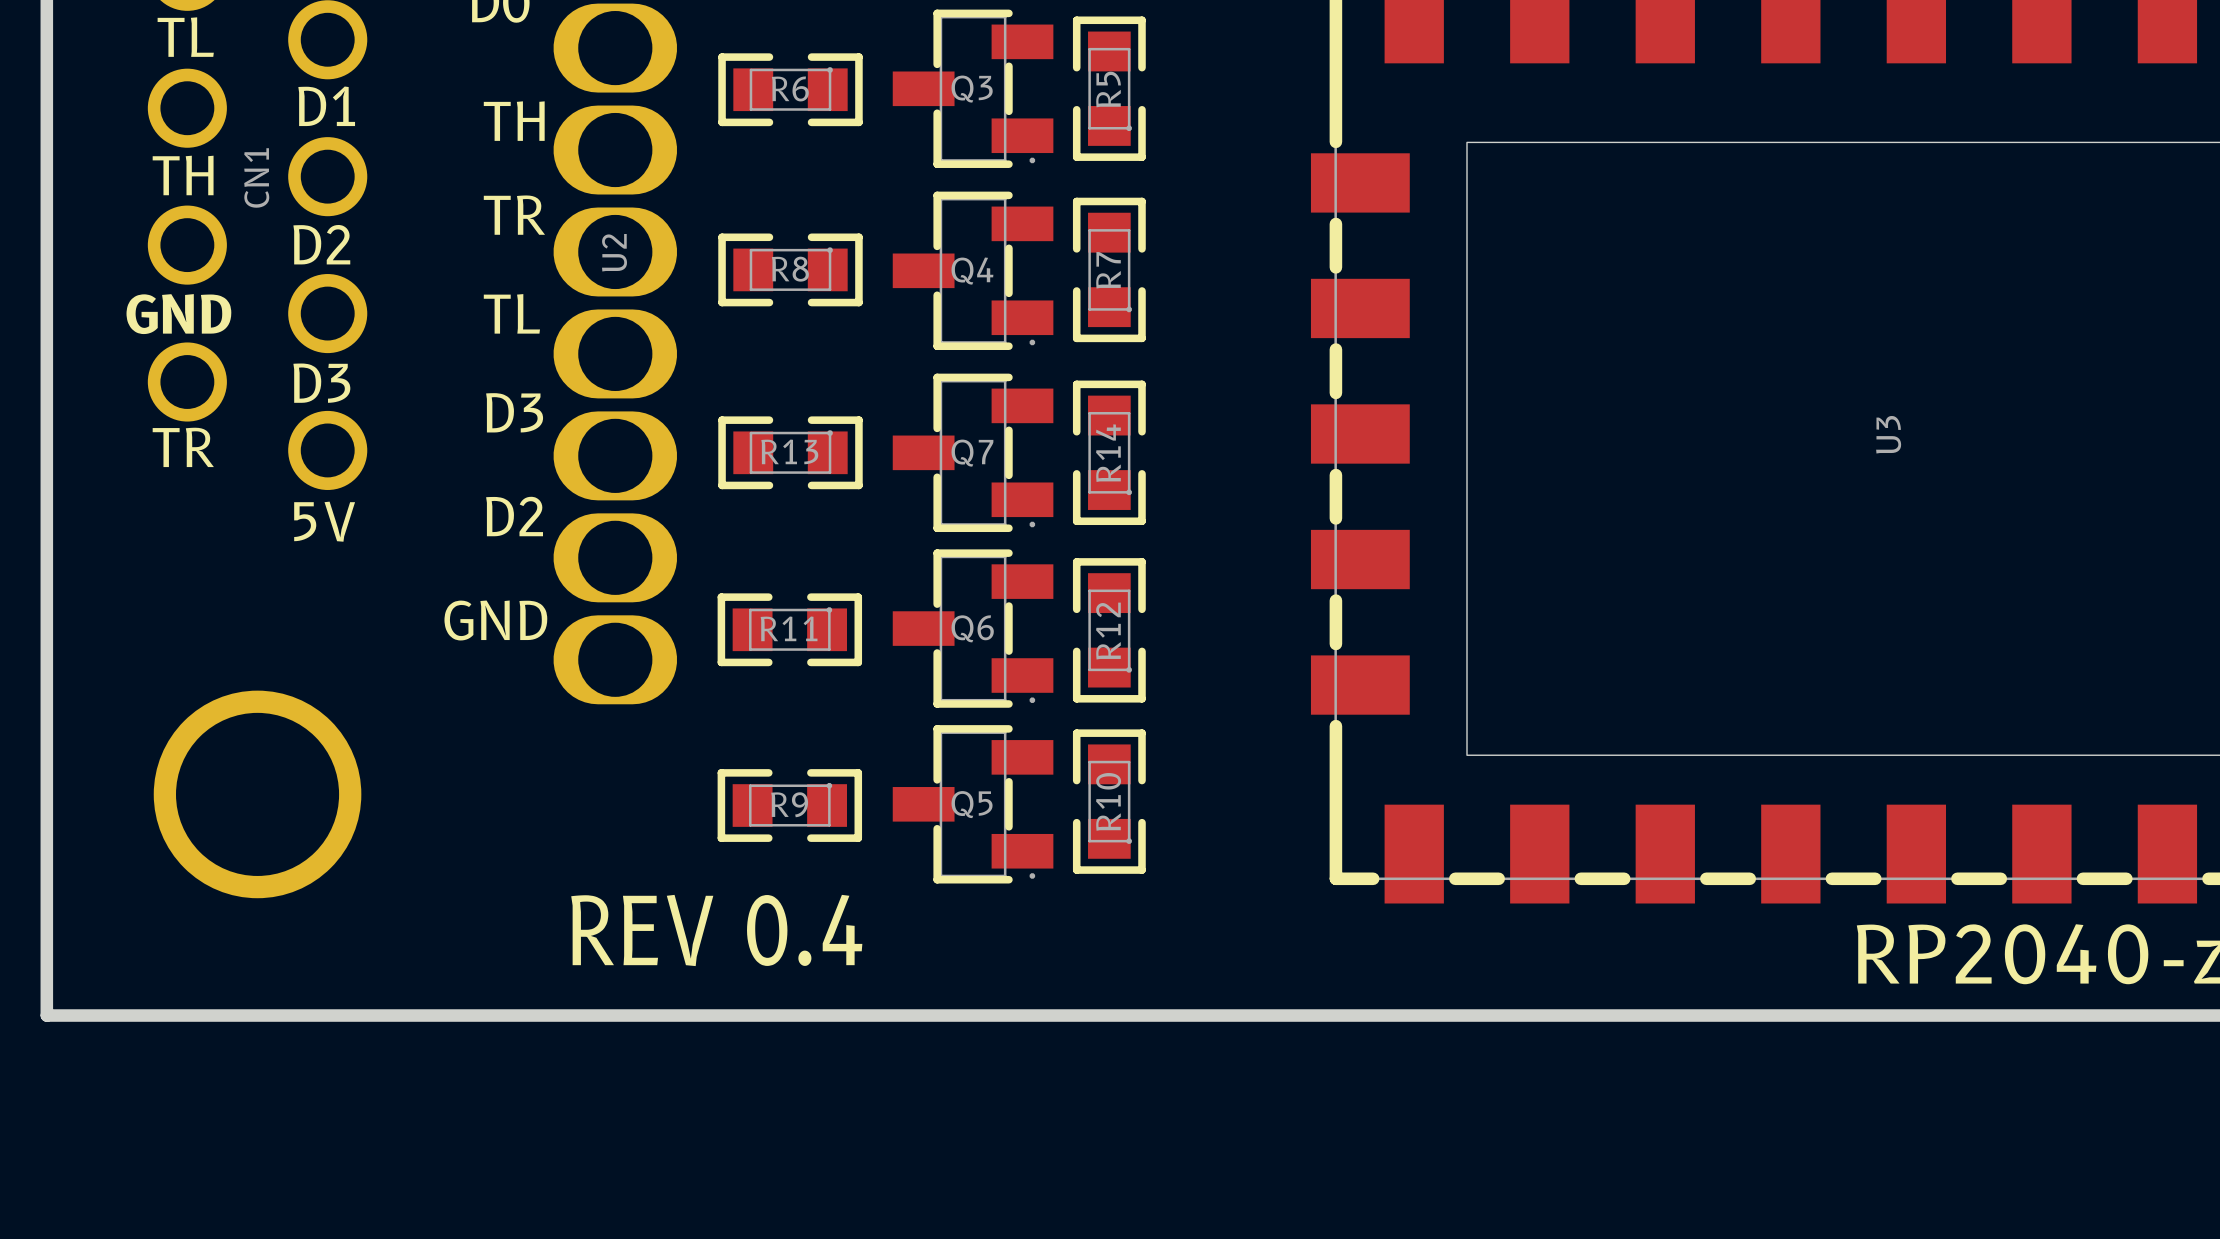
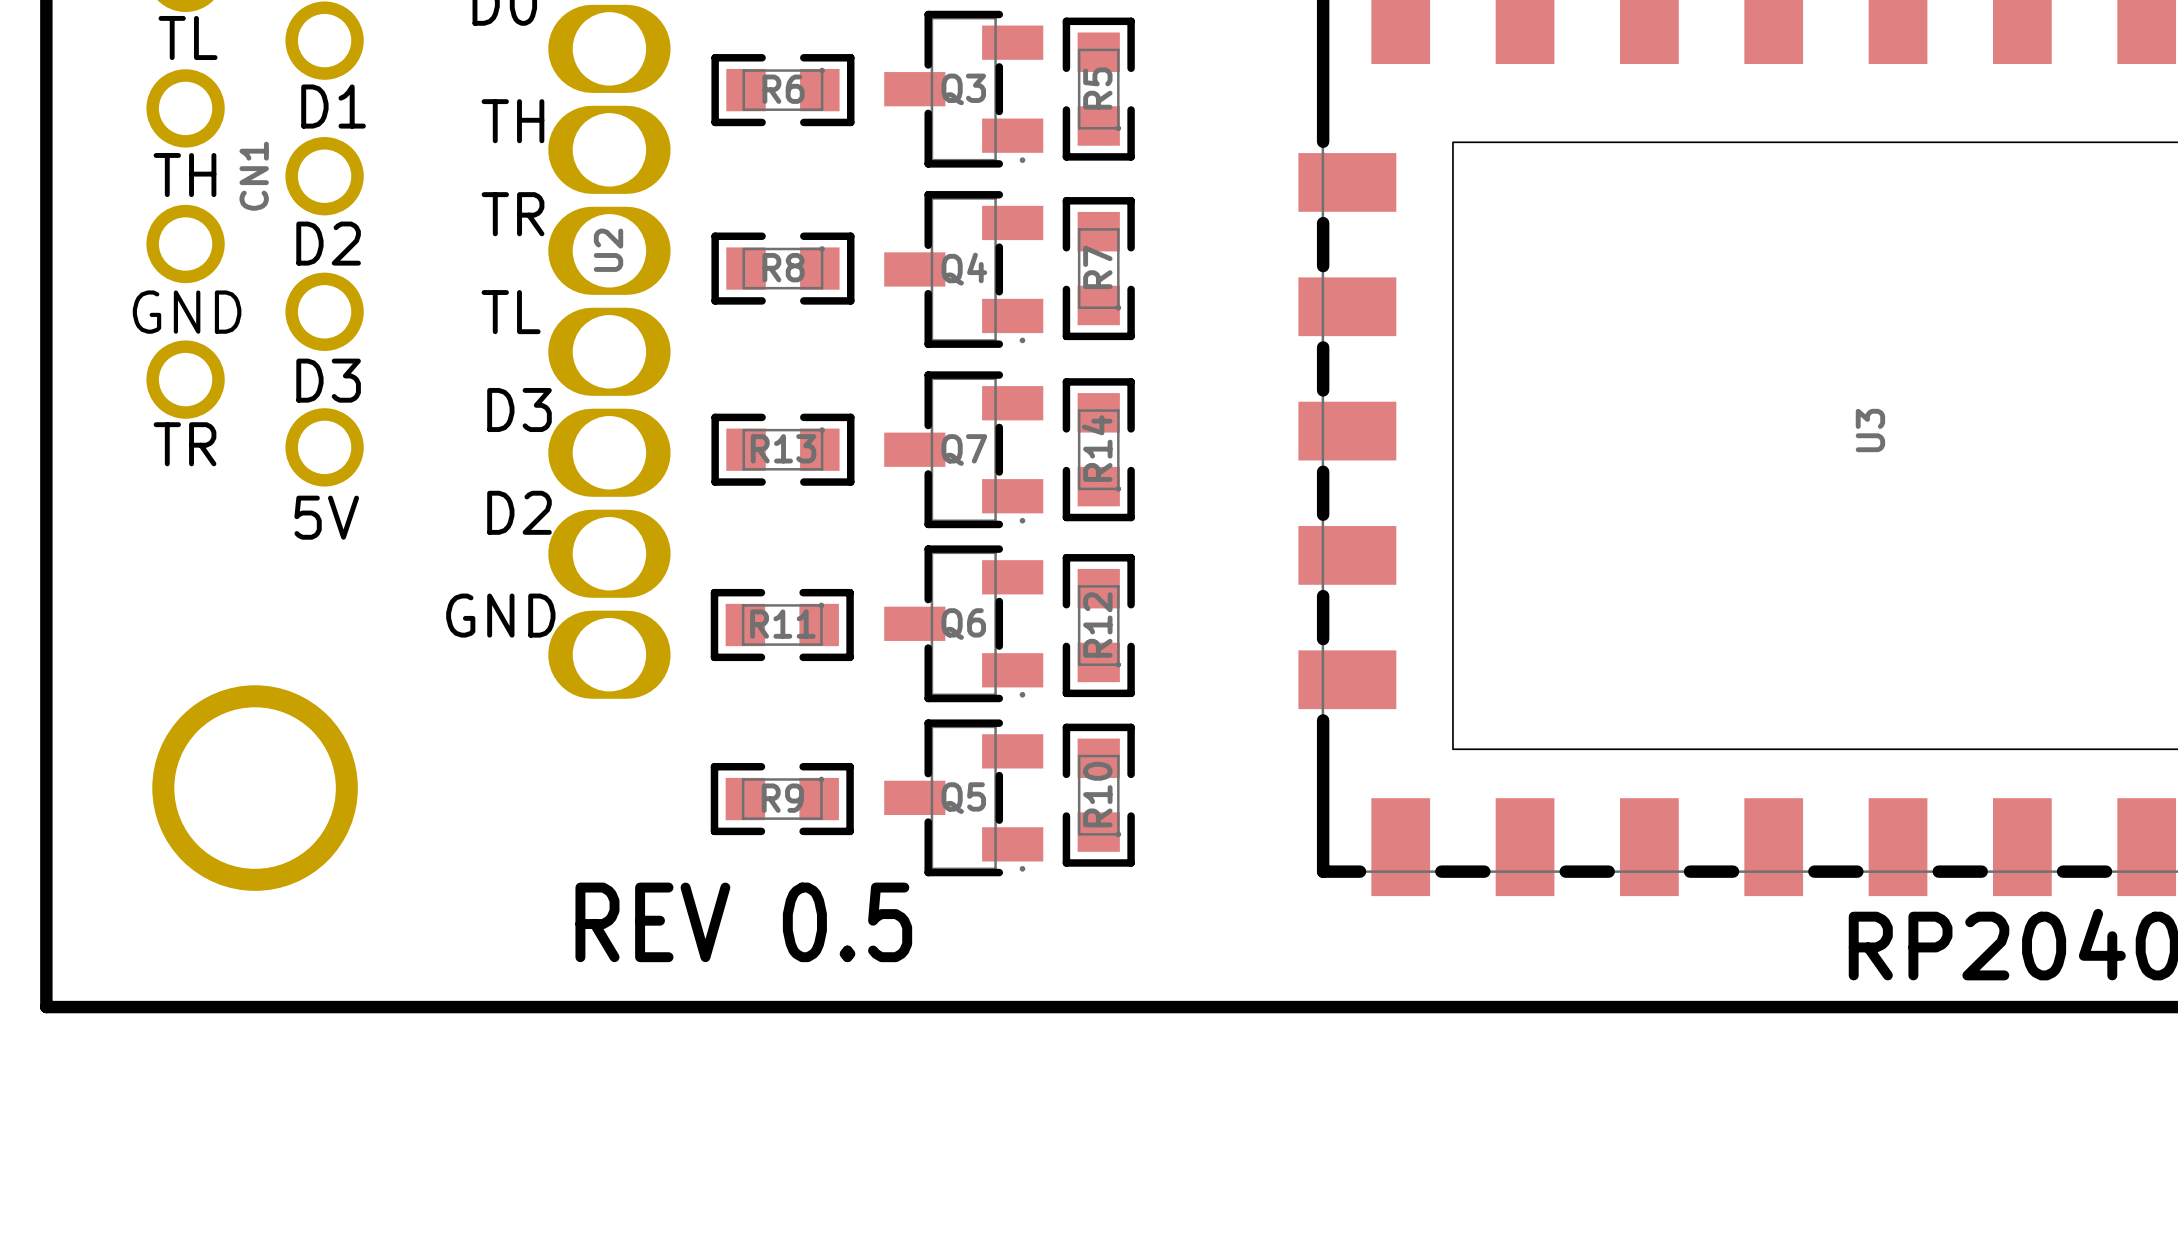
text: REV 0.4 (716, 930) -> REV 0.5 (743, 922)

